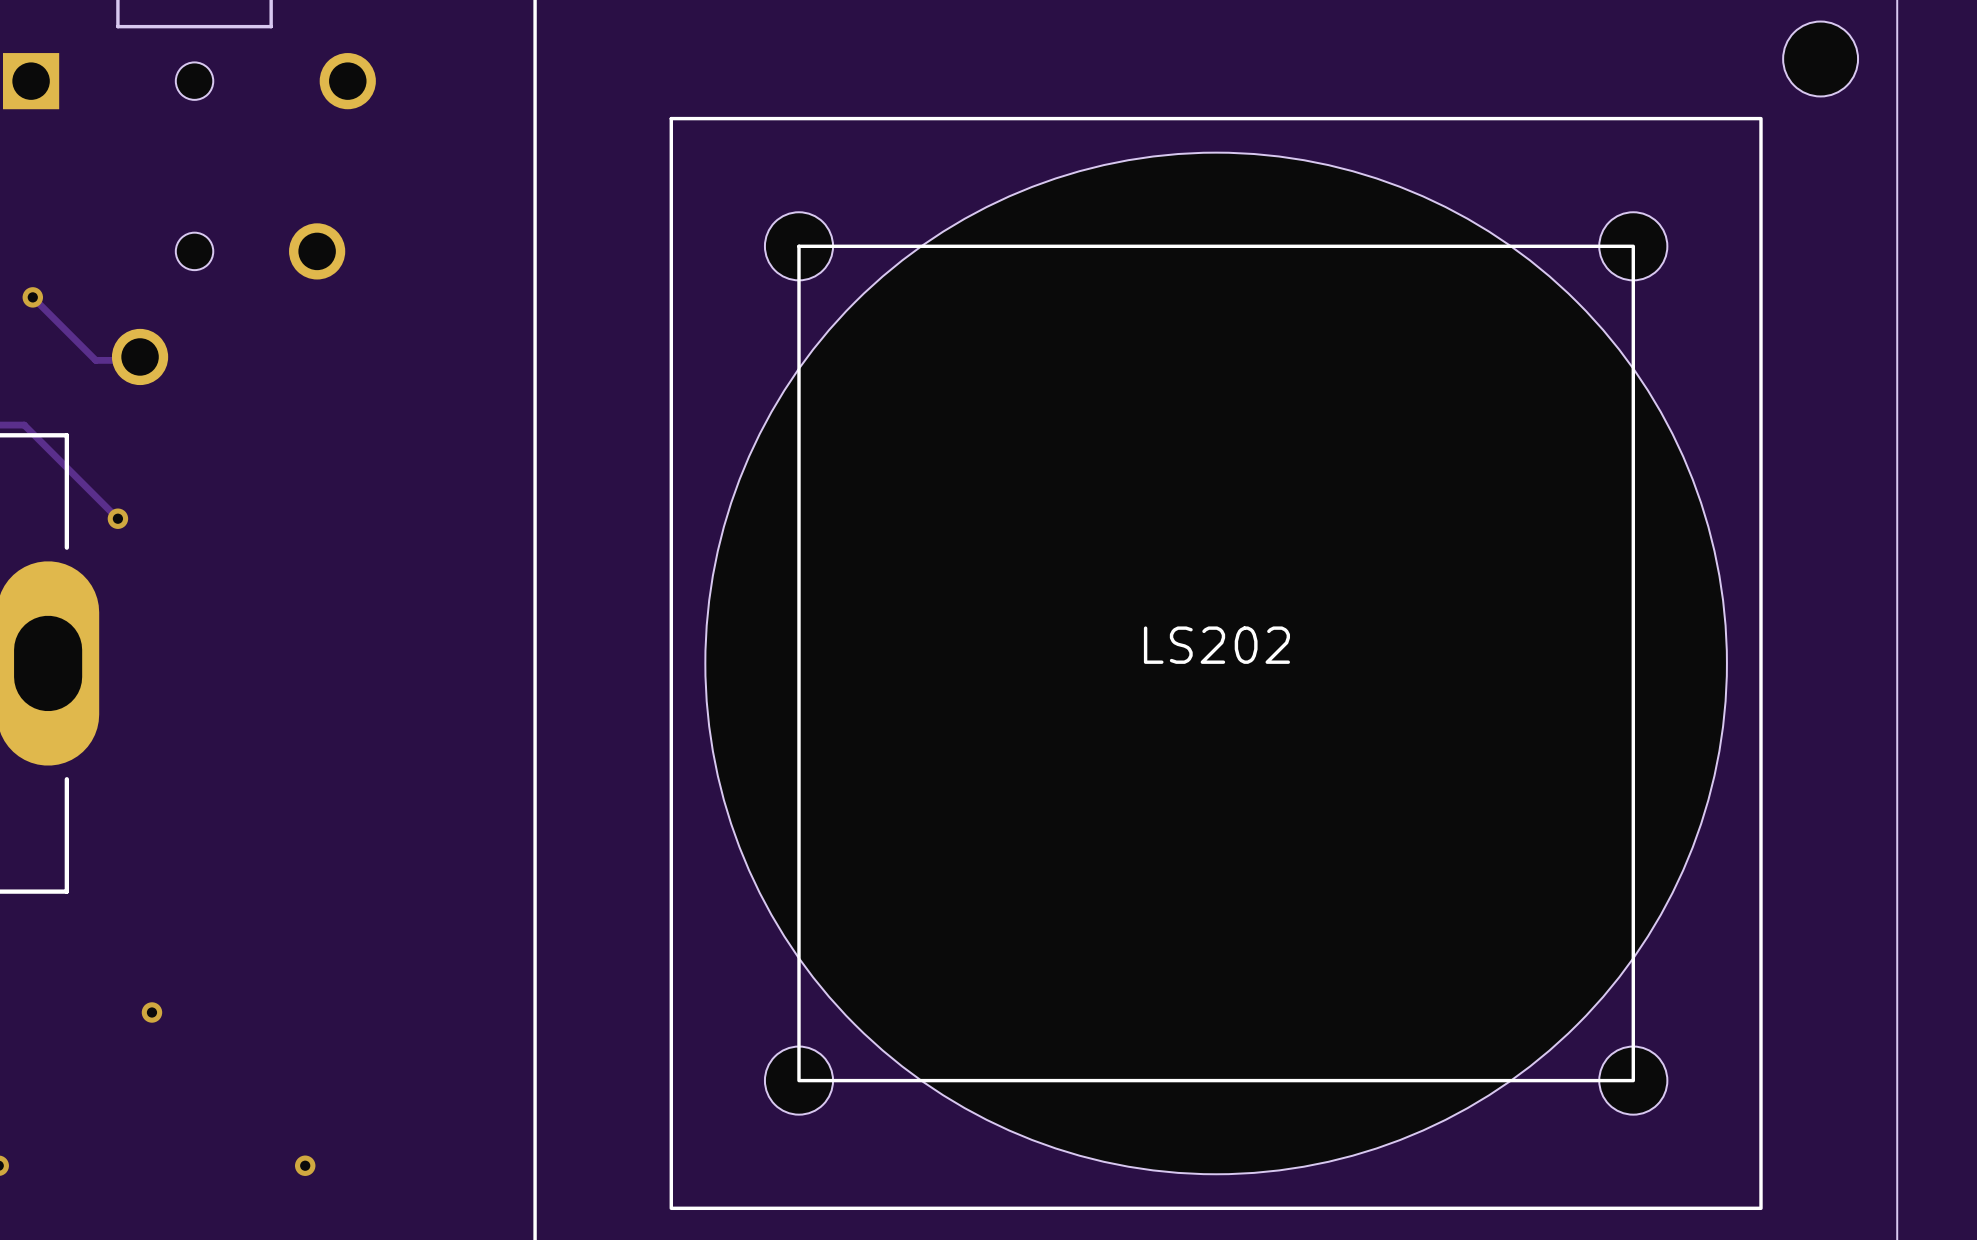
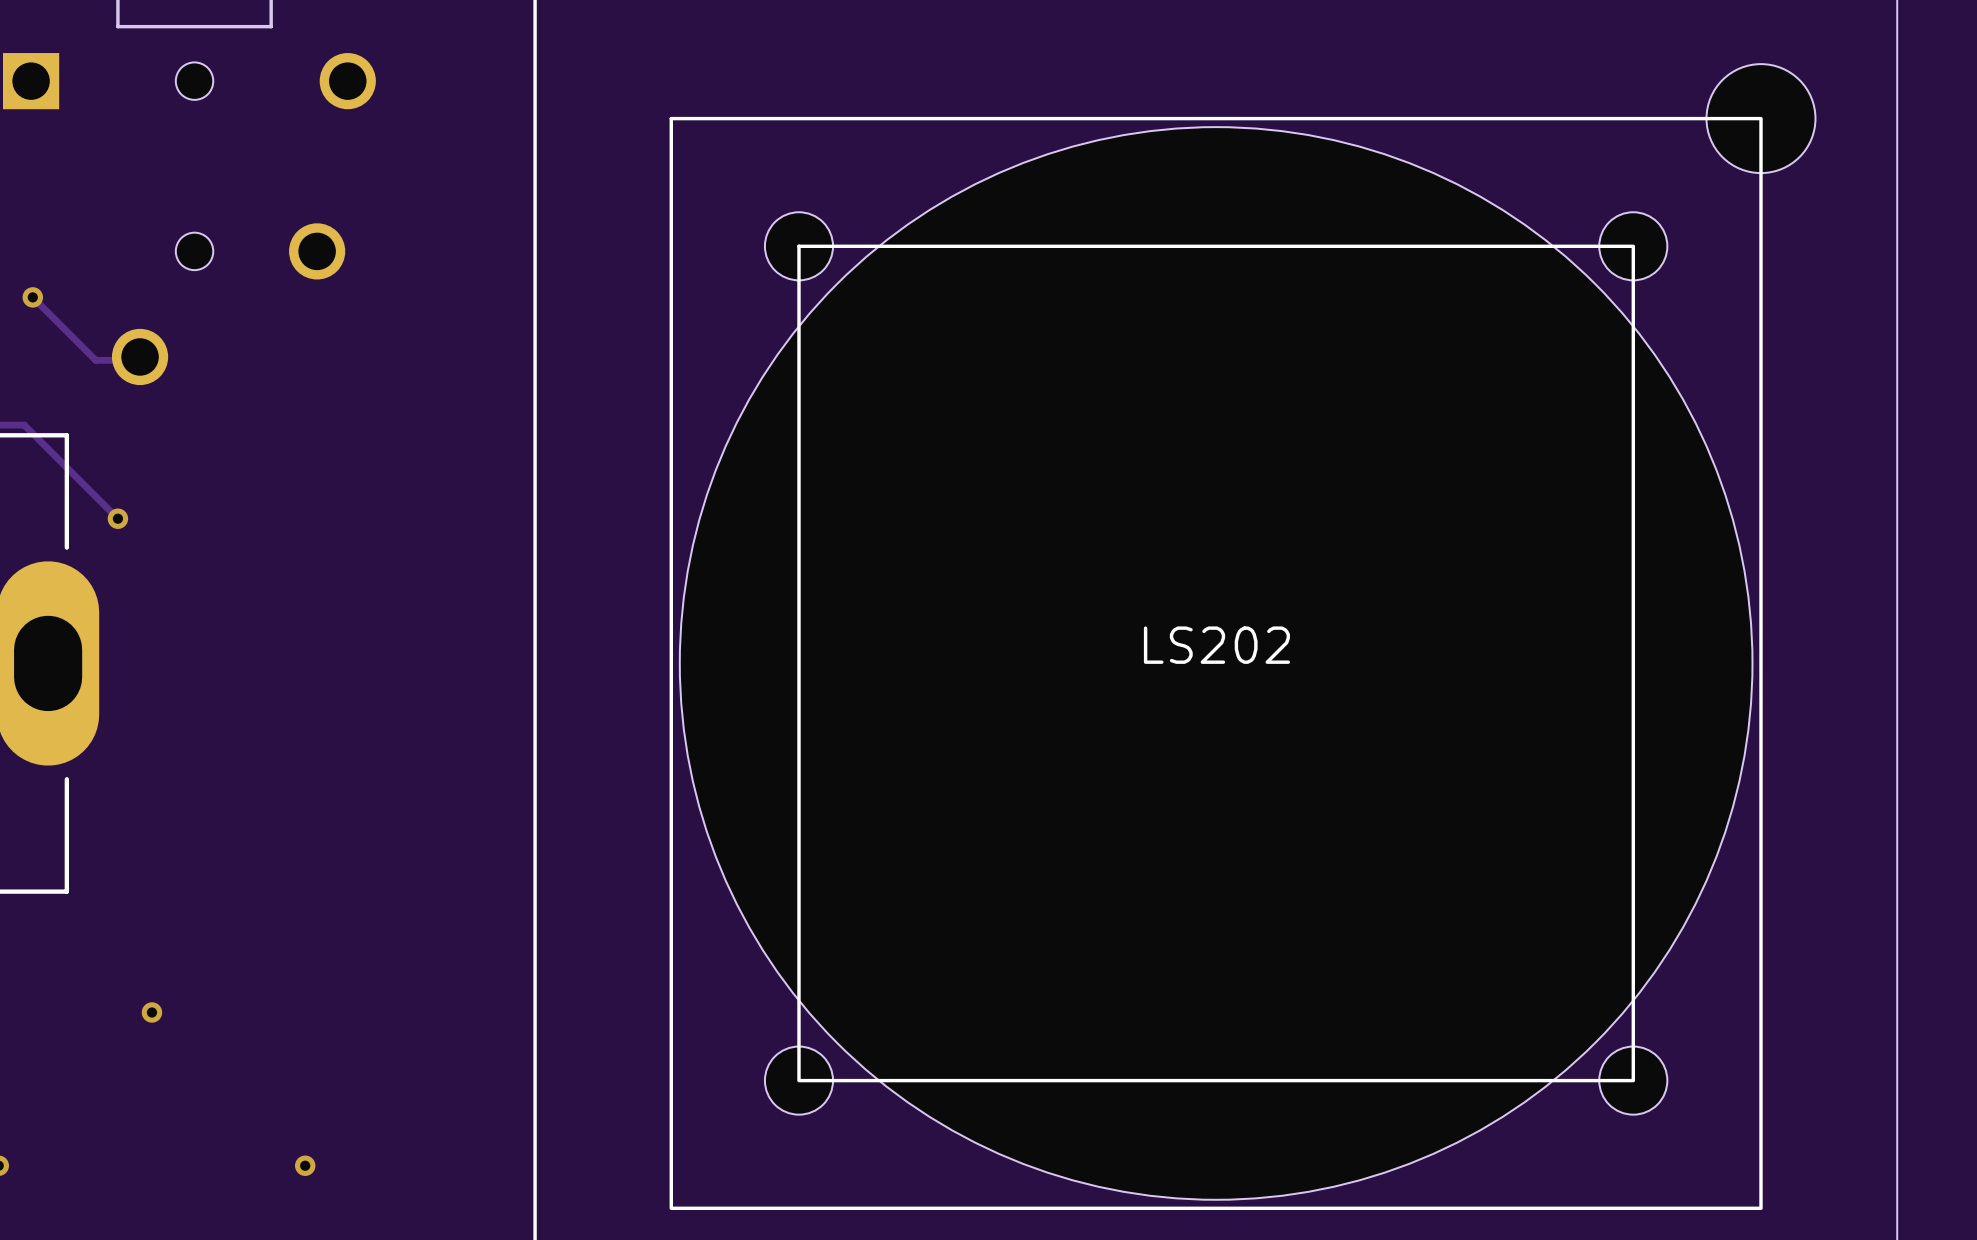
part: (1820, 59) -> none
LS202 footprint: [669, 116, 1763, 1211] -> [669, 116, 1763, 1211]
part: none -> (1760, 118)

